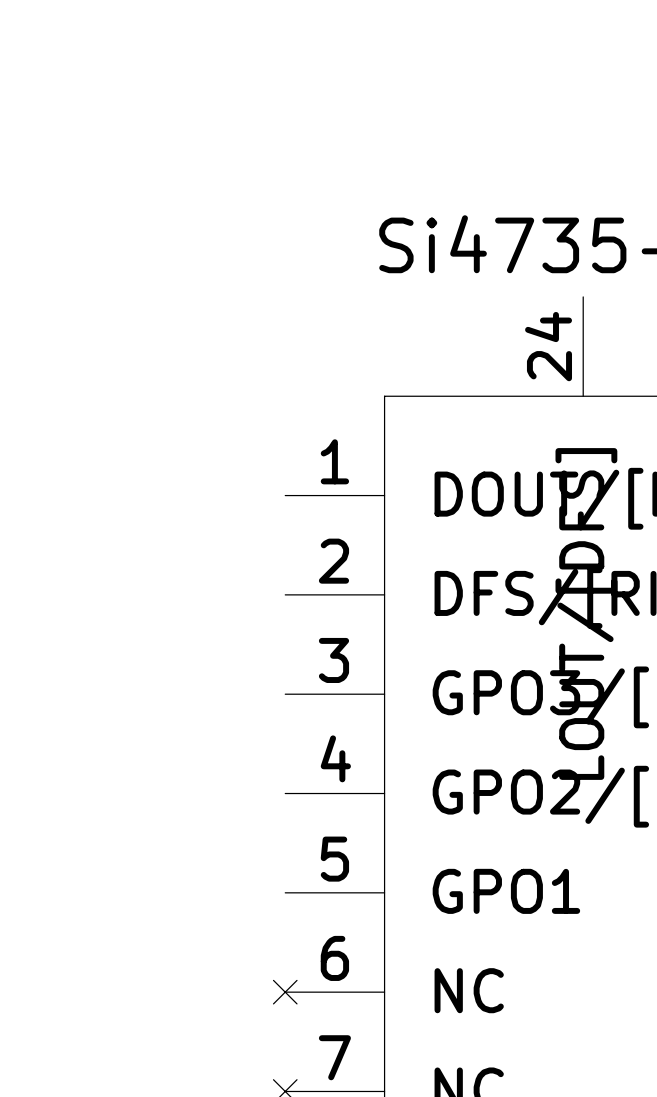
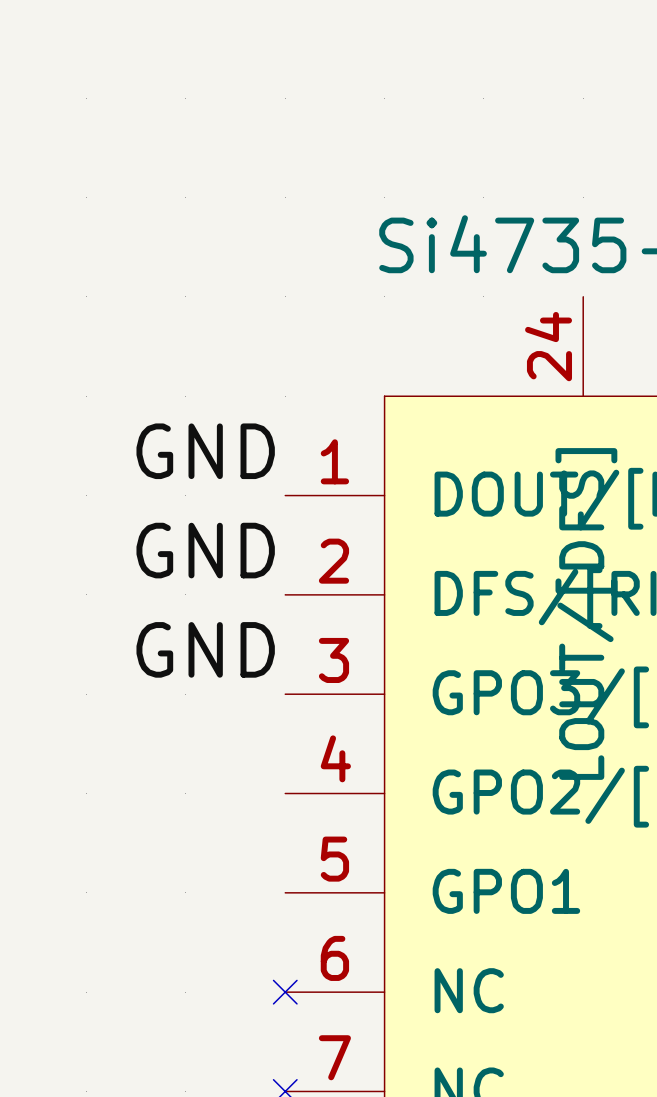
label: none -> GND (205, 451)
label: none -> GND (205, 550)
label: none -> GND (205, 649)

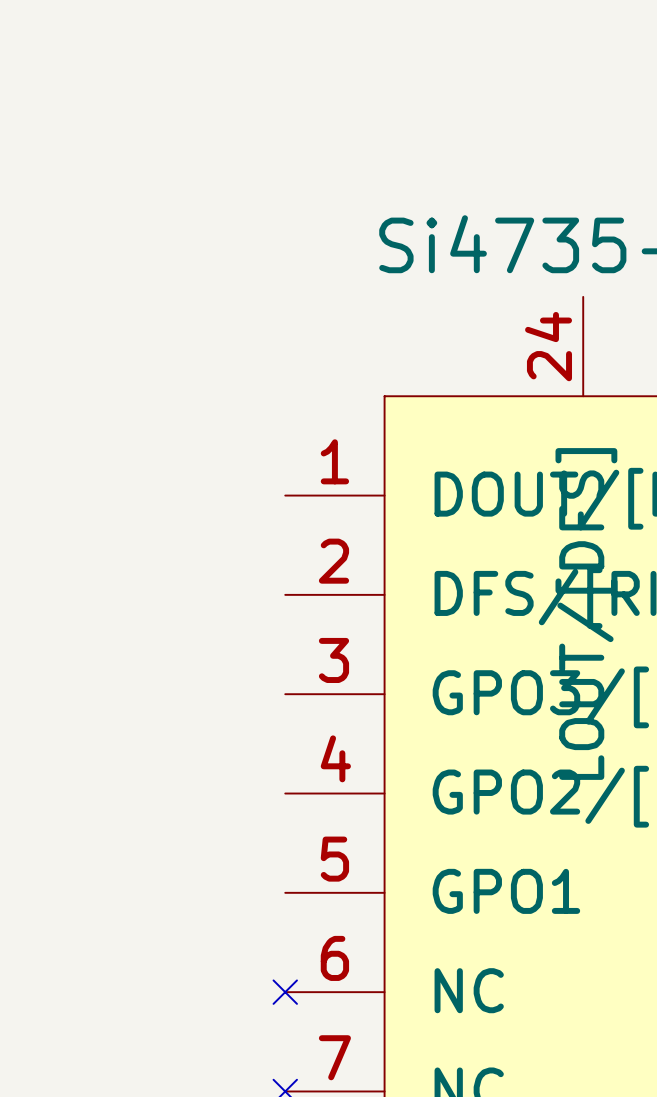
label: GND (205, 451) -> none
label: GND (205, 550) -> none
label: GND (205, 649) -> none

